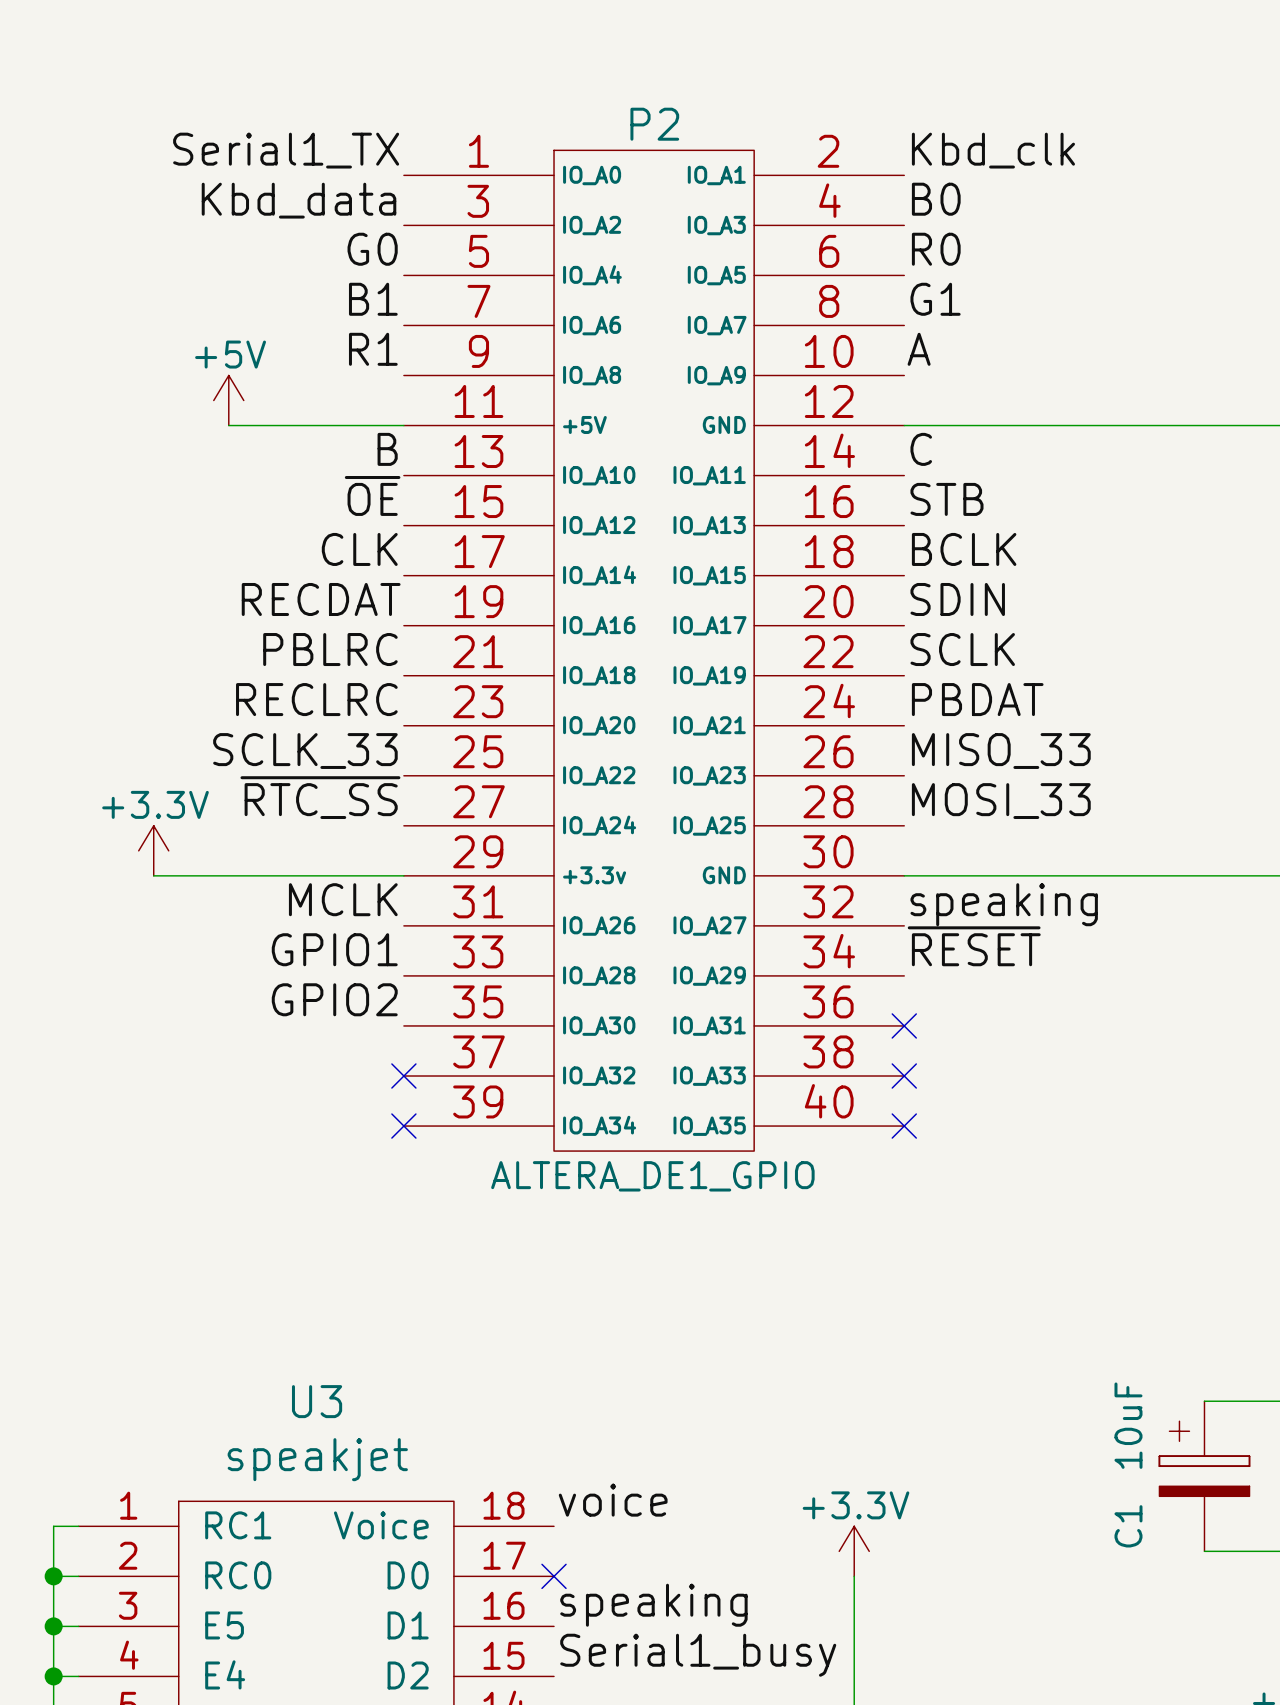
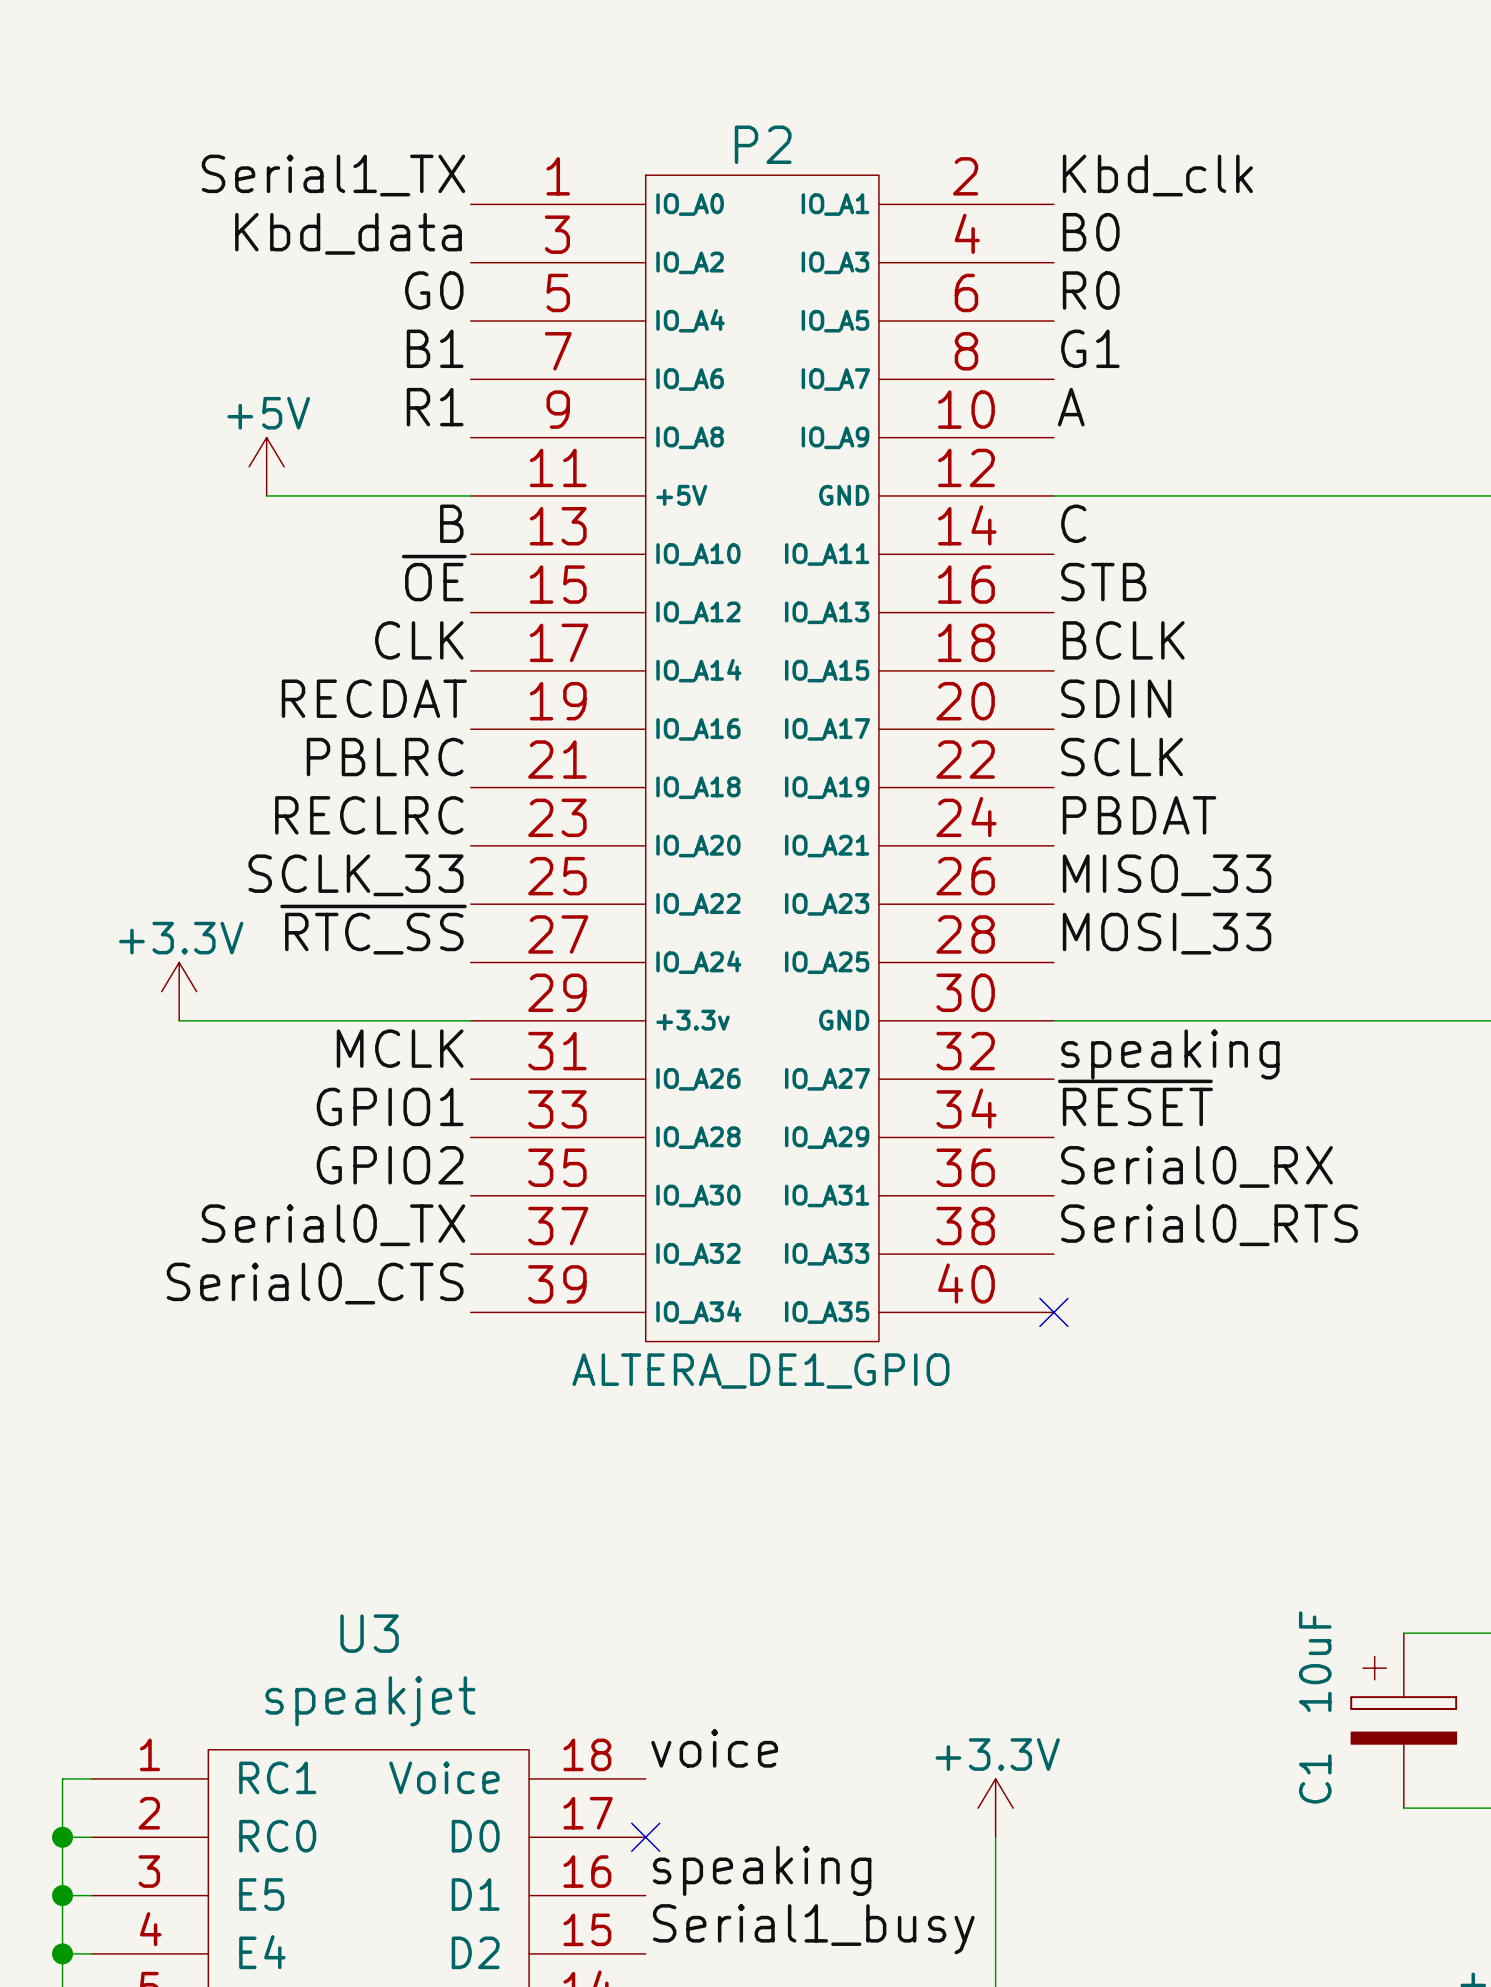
label: none -> Serial0_RX (1197, 1166)
no-connect mark: (904, 1025) -> none
label: none -> Serial0_TX (333, 1225)
label: none -> Serial0_RTS (1209, 1225)
no-connect mark: (403, 1076) -> none
no-connect mark: (904, 1076) -> none
label: none -> Serial0_CTS (315, 1283)
no-connect mark: (403, 1126) -> none

